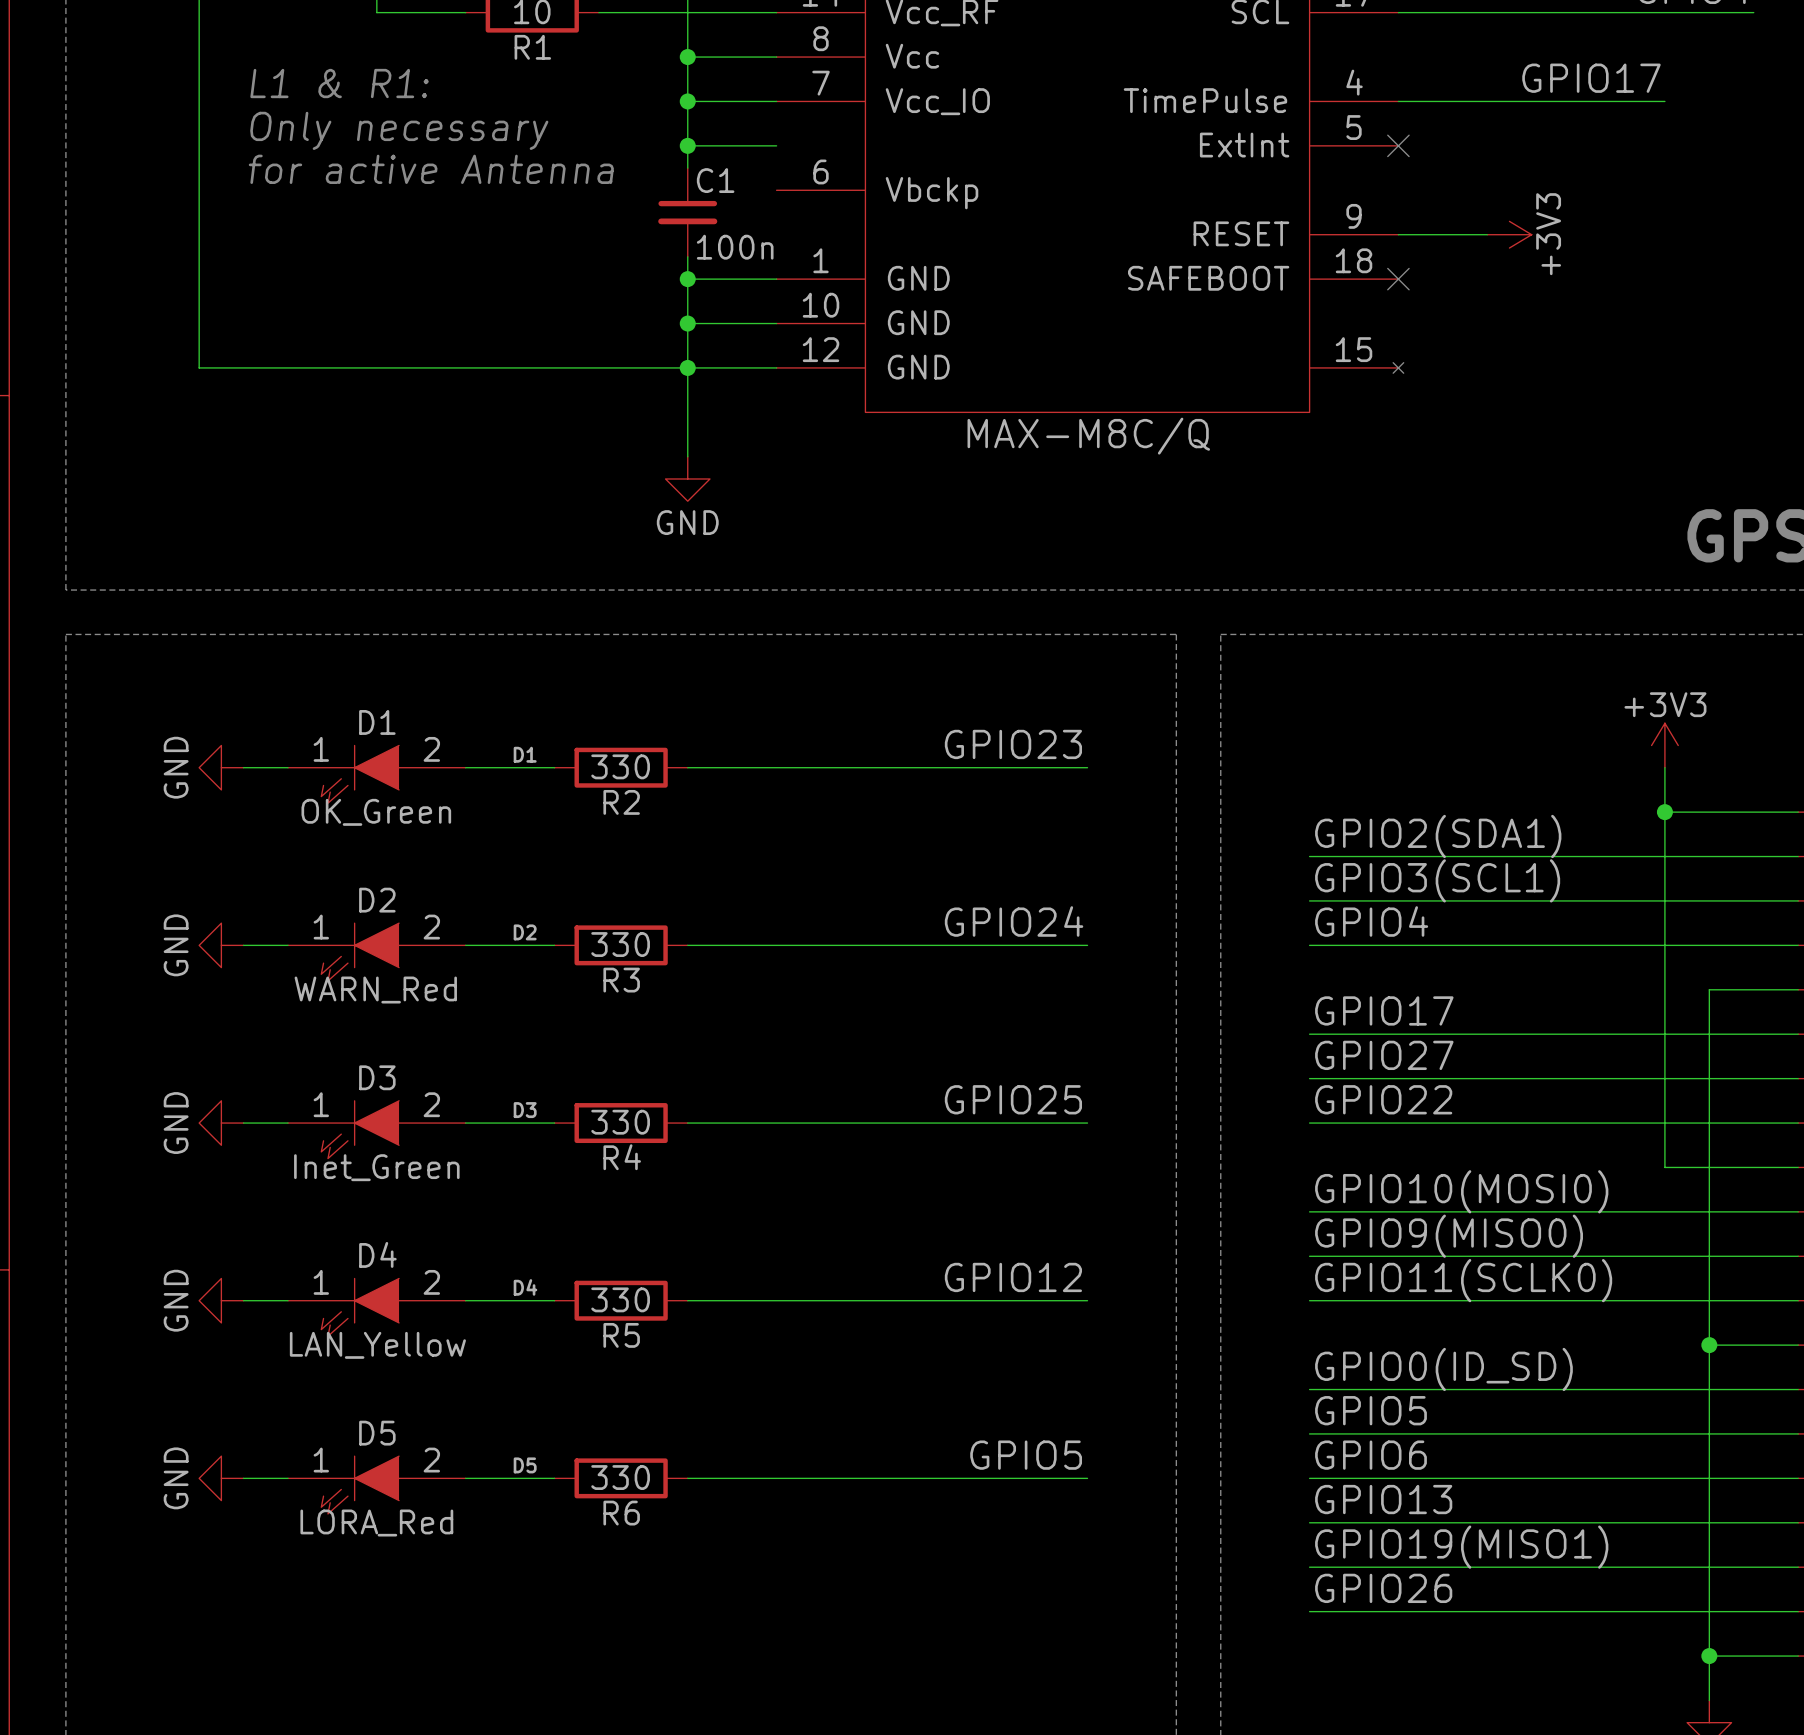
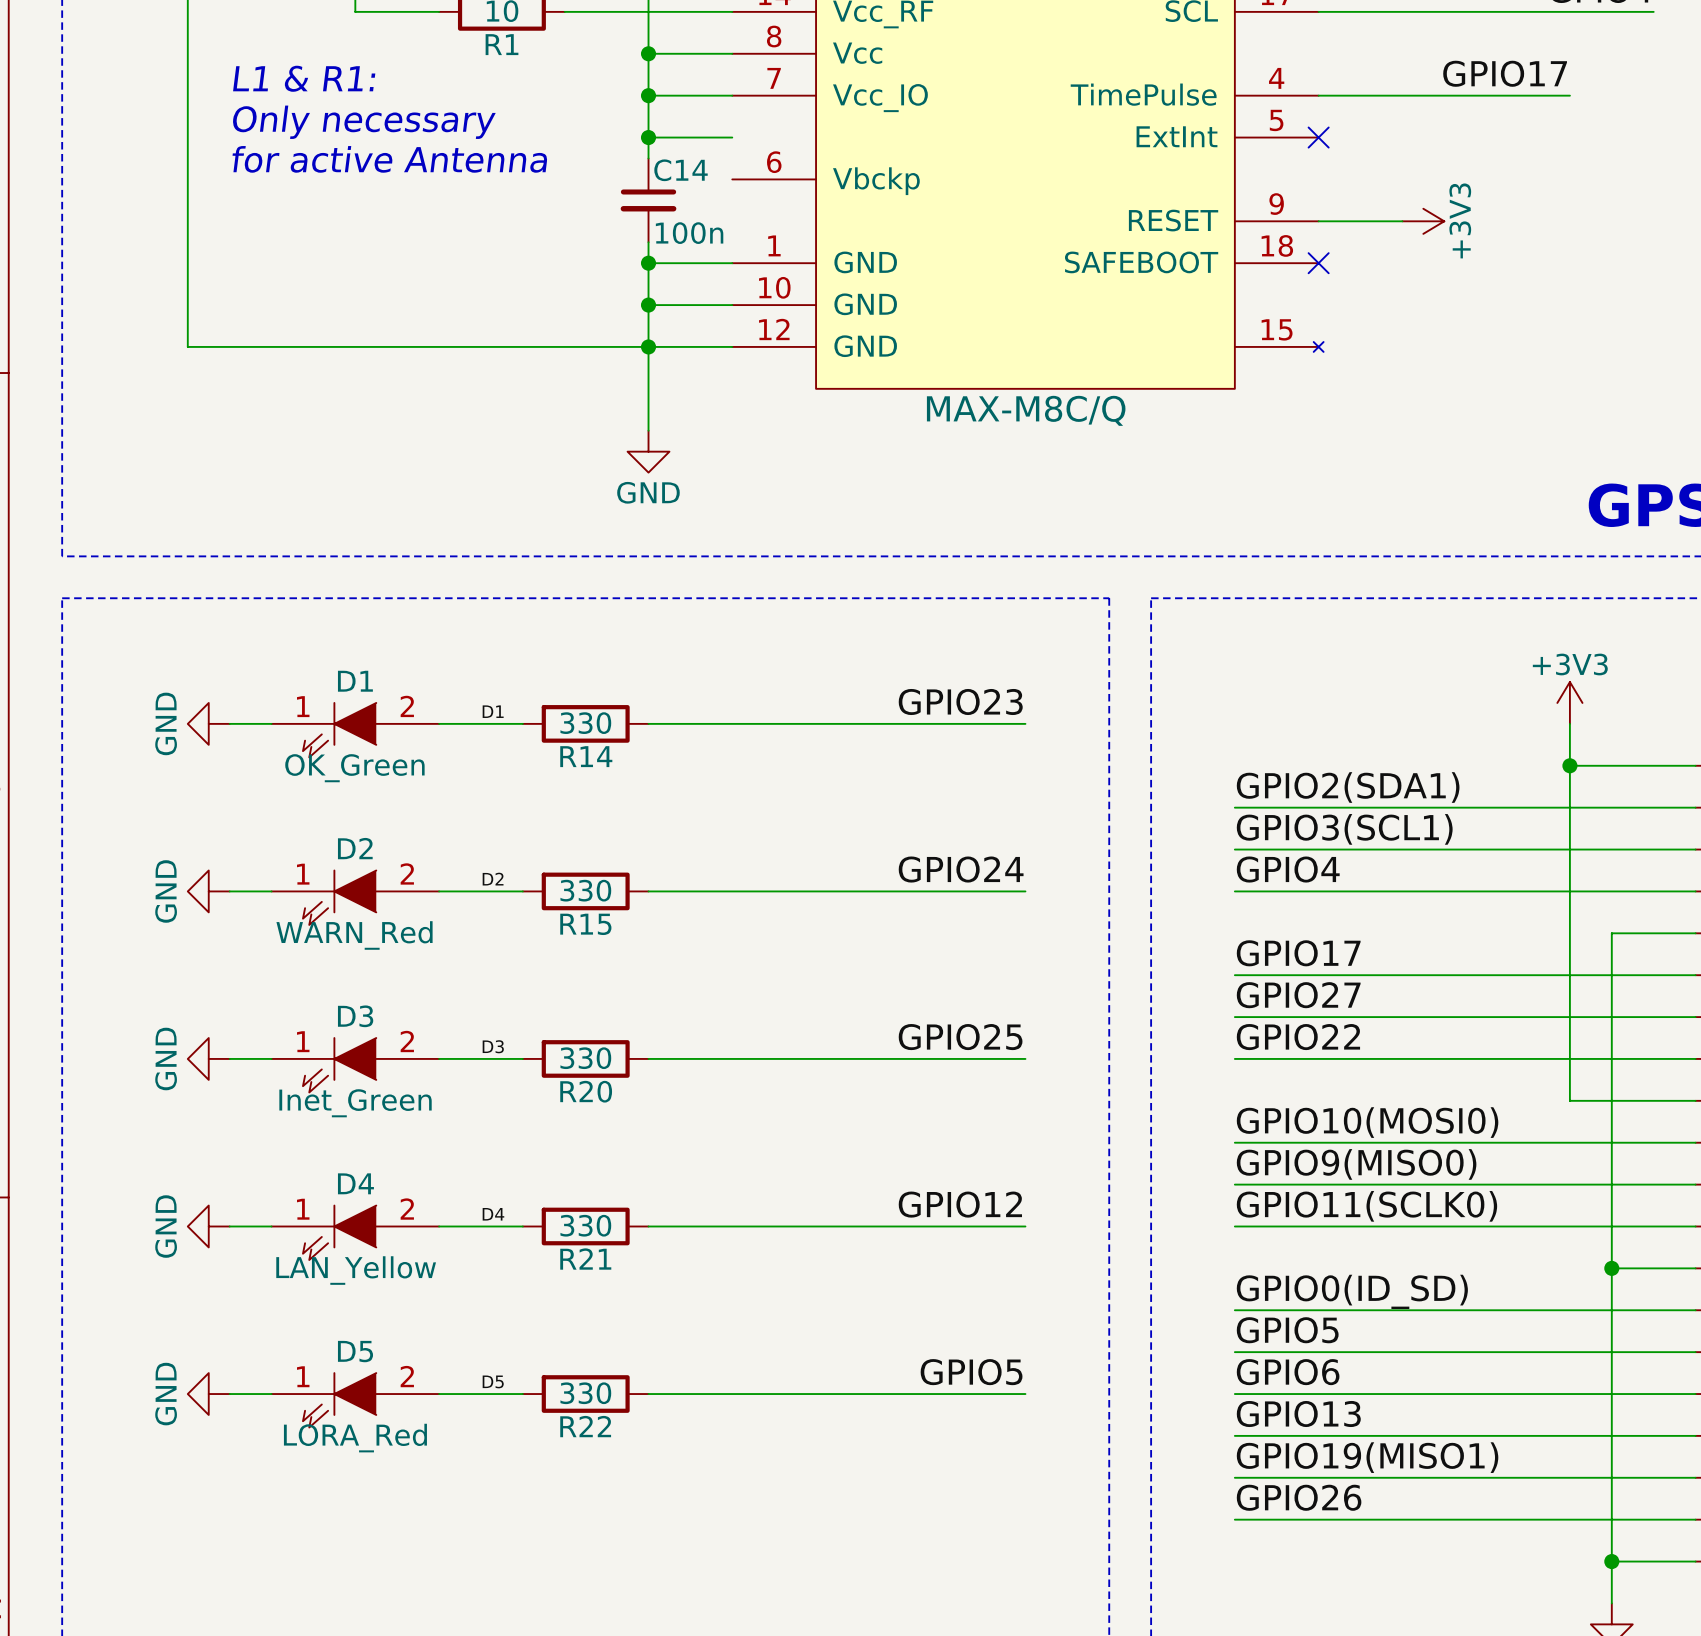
C1 name: C1 (715, 180) -> C14 (681, 170)
R2 name: R2 (621, 802) -> R14 (586, 756)
R3 name: R3 (621, 980) -> R15 (585, 924)
R4 name: R4 (622, 1157) -> R20 (586, 1091)
R5 name: R5 (621, 1335) -> R21 (585, 1259)
R6 name: R6 (621, 1513) -> R22 (585, 1426)

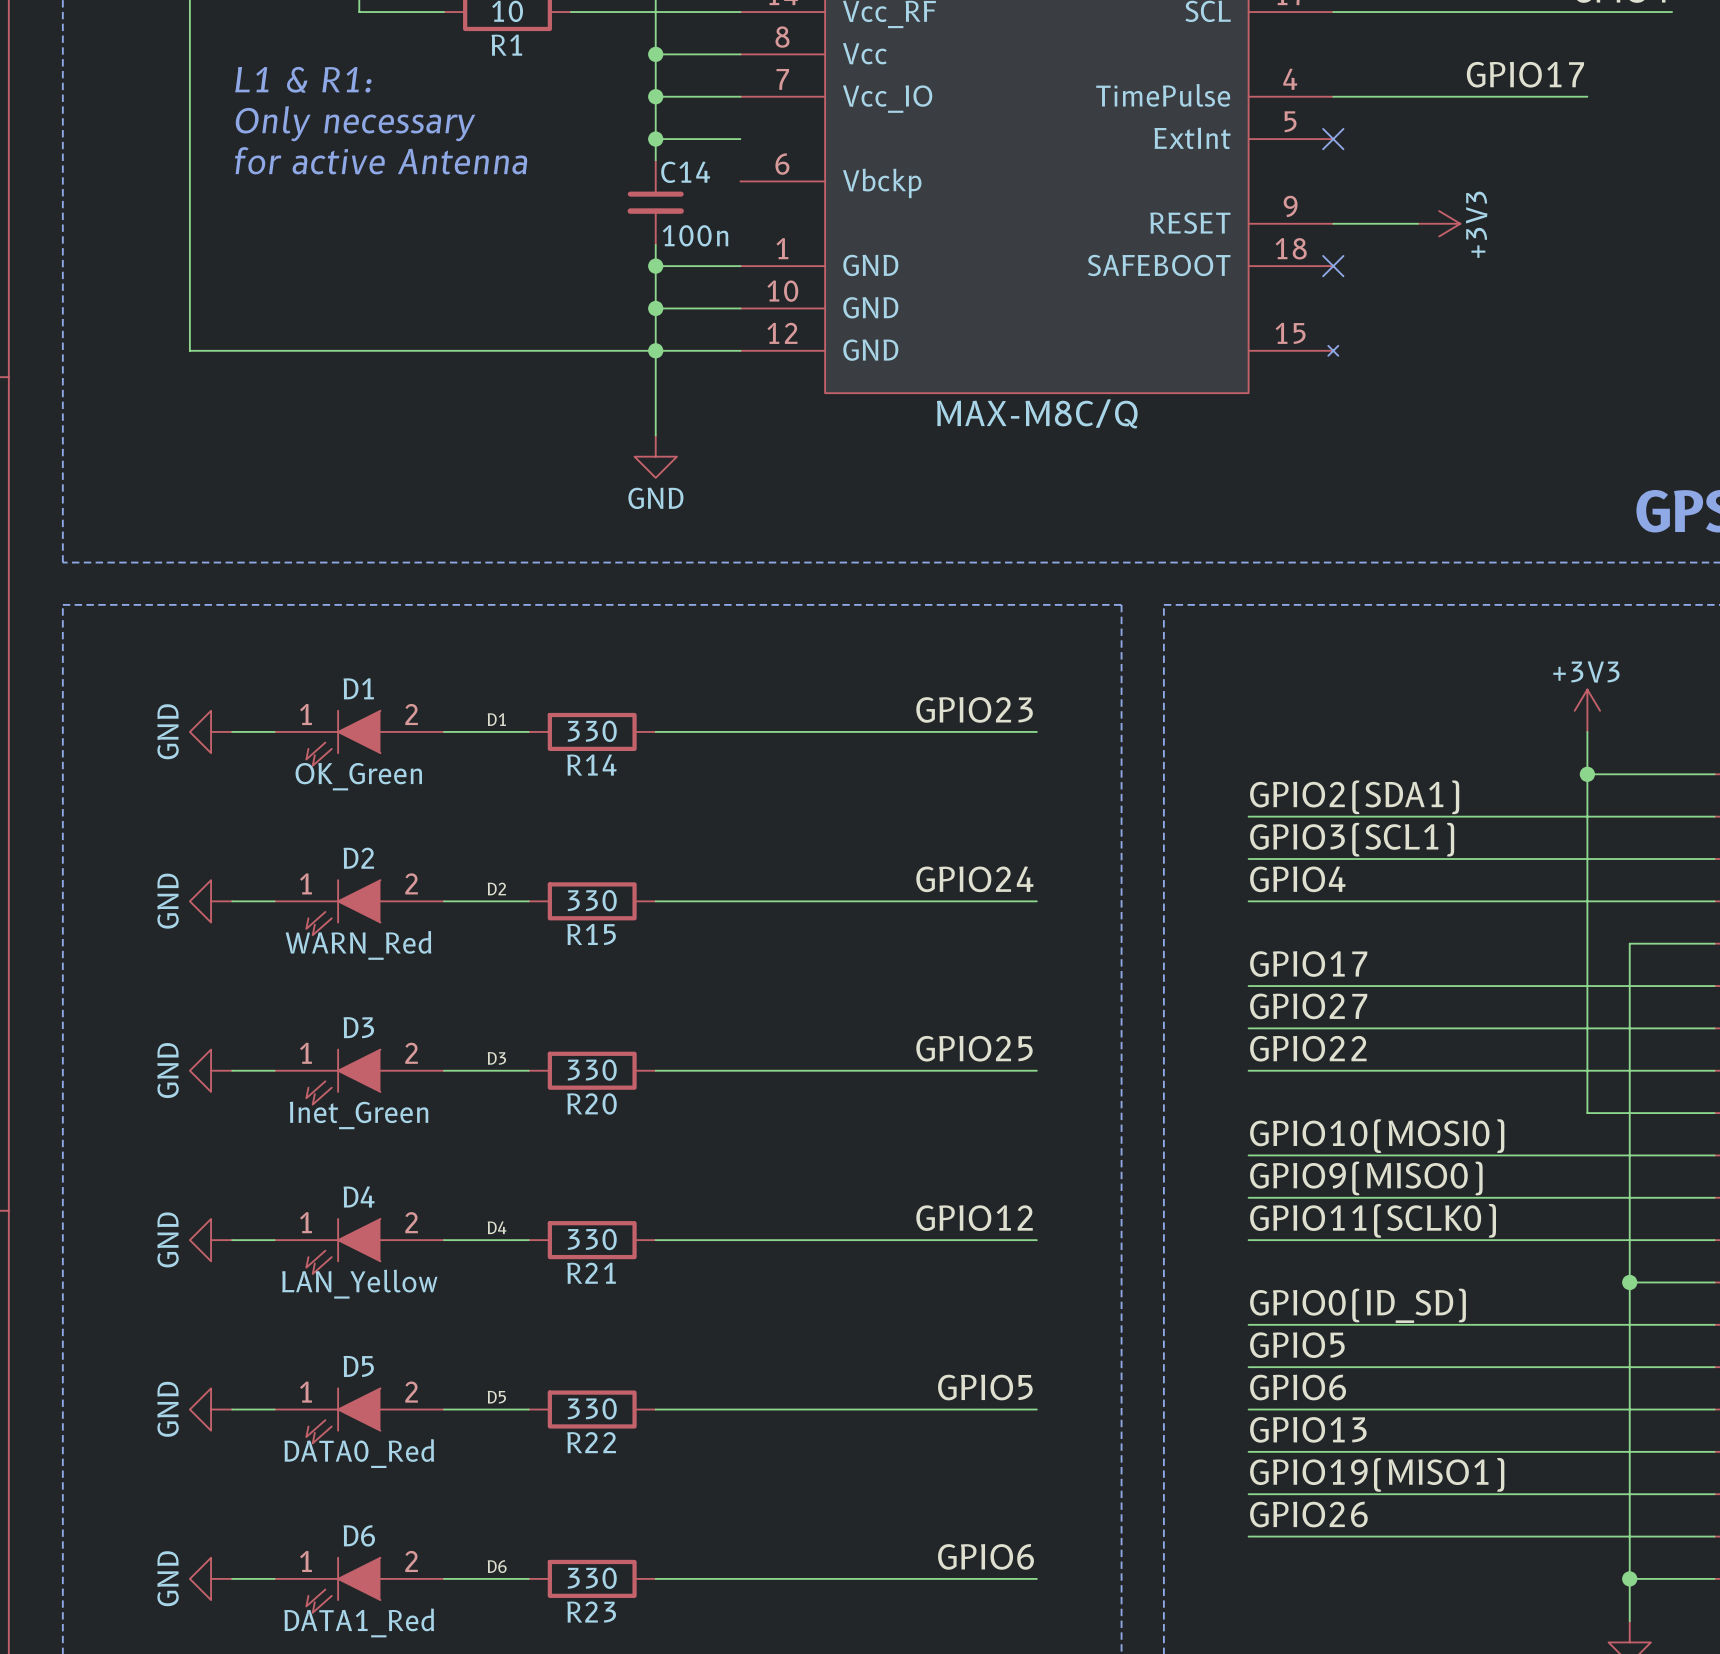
D5 value: LORA_Red (355, 1438) -> DATA0_Red (359, 1453)
label: none -> GPIO6 (986, 1556)
label: none -> D6 (497, 1566)
power symbol: none -> GND (211, 1578)
wire: none -> (232, 1578) (274, 1578)
wire: none -> (443, 1578) (528, 1578)
R23: none -> 330 (592, 1578)
wire: none -> (655, 1578) (1036, 1578)
D6: none -> DATA1_Red (359, 1585)

